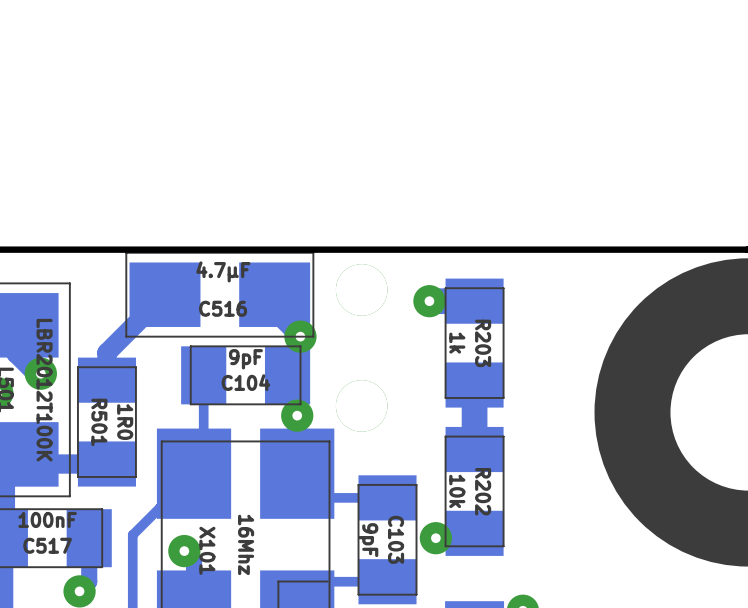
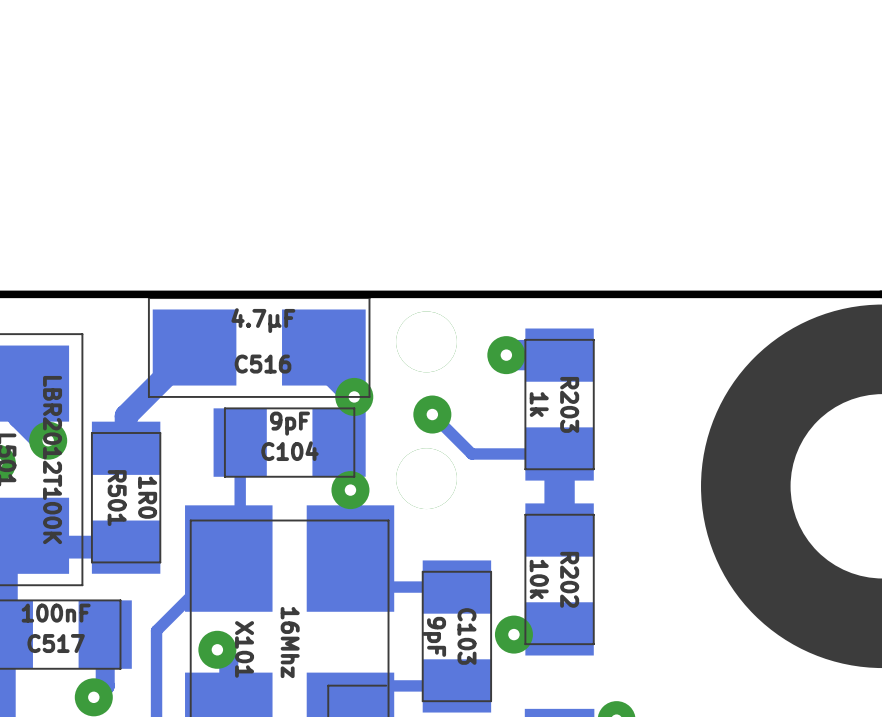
track: none -> (432, 414) (471, 453) (559, 453)
via: none -> (432, 414)

